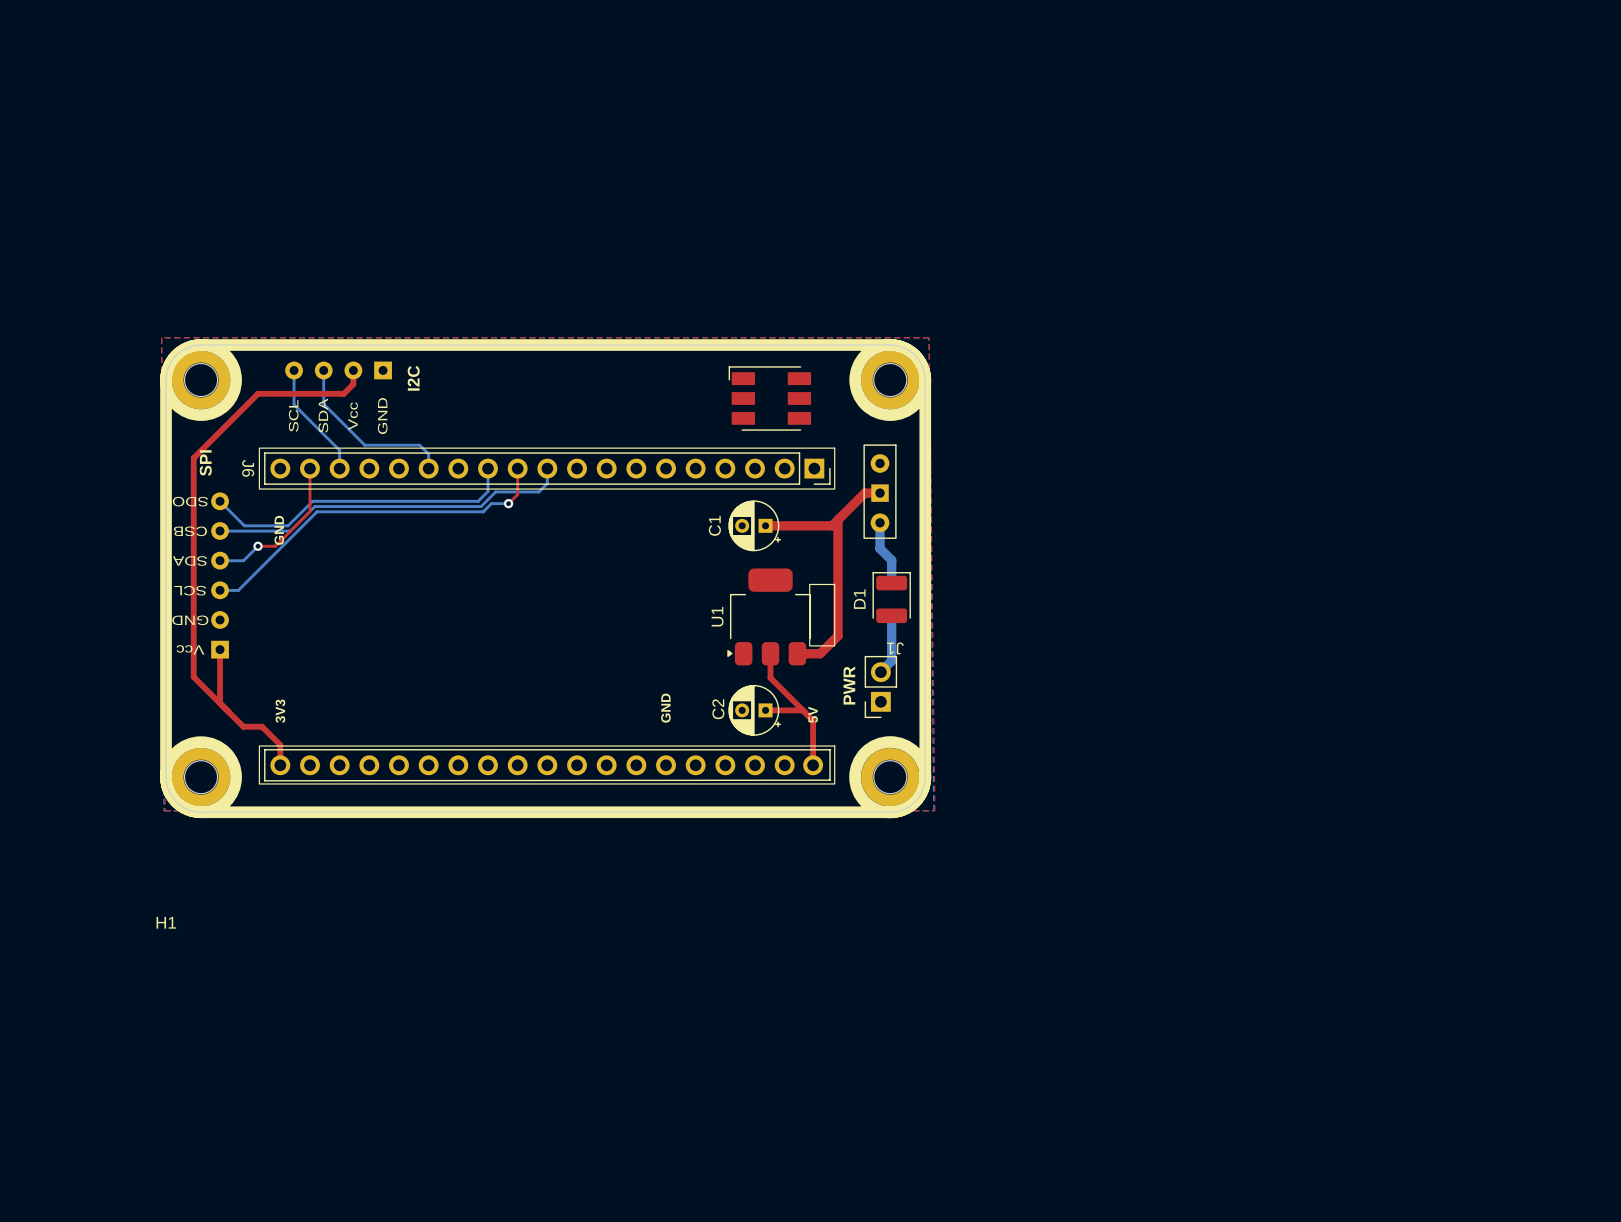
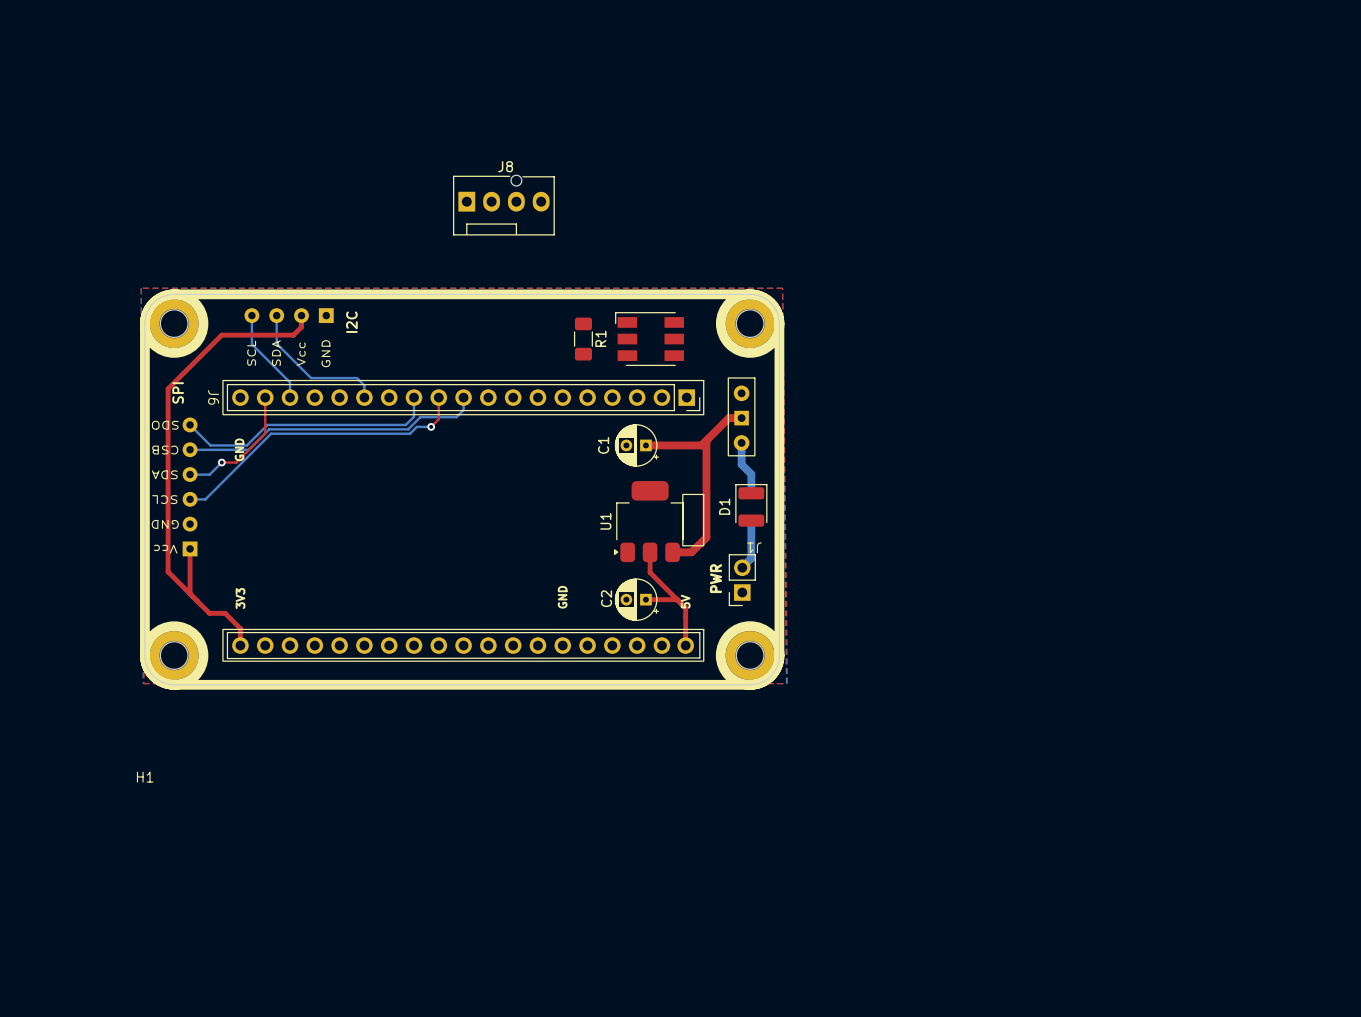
J8: none -> (503, 205)
R1: none -> (583, 339)

